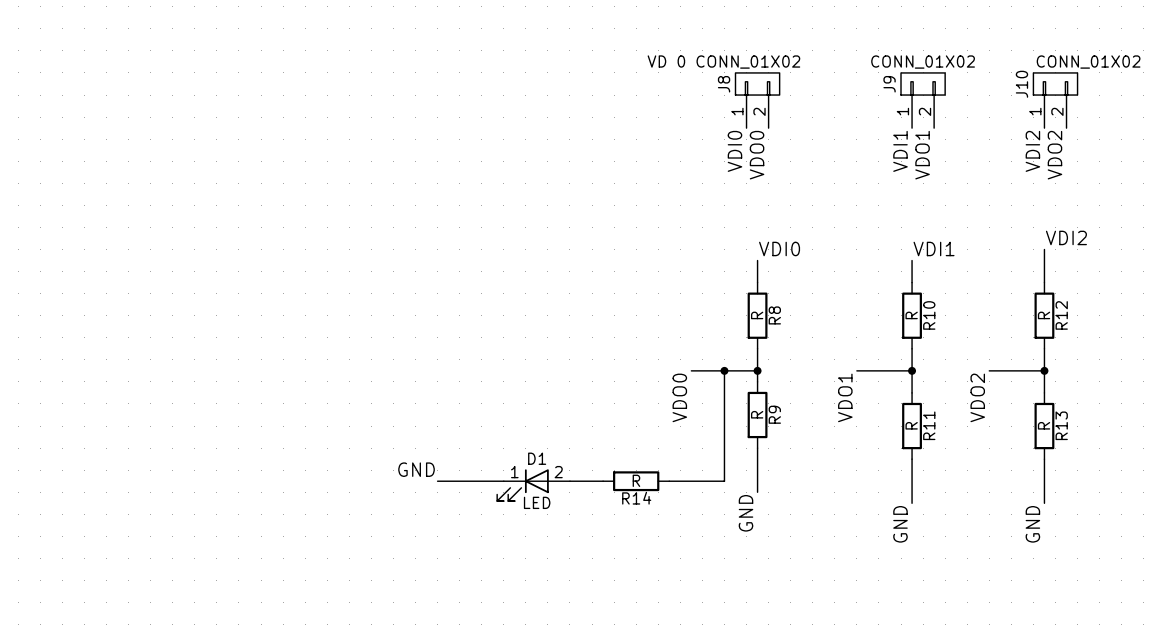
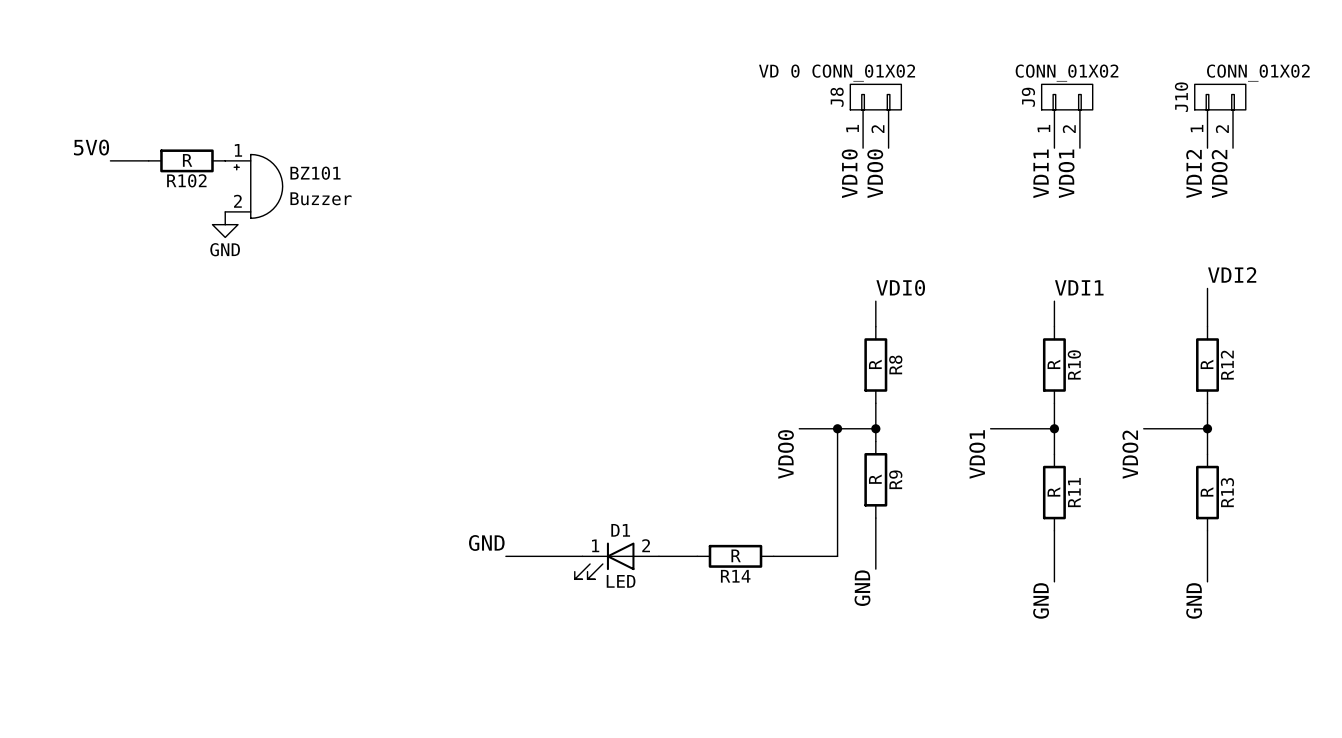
label: none -> 5V0 (91, 147)
wire: none -> (110, 160) (148, 160)
R102: none -> R (186, 160)
BZ101: none -> Buzzer (253, 186)
power symbol: none -> GND (225, 224)

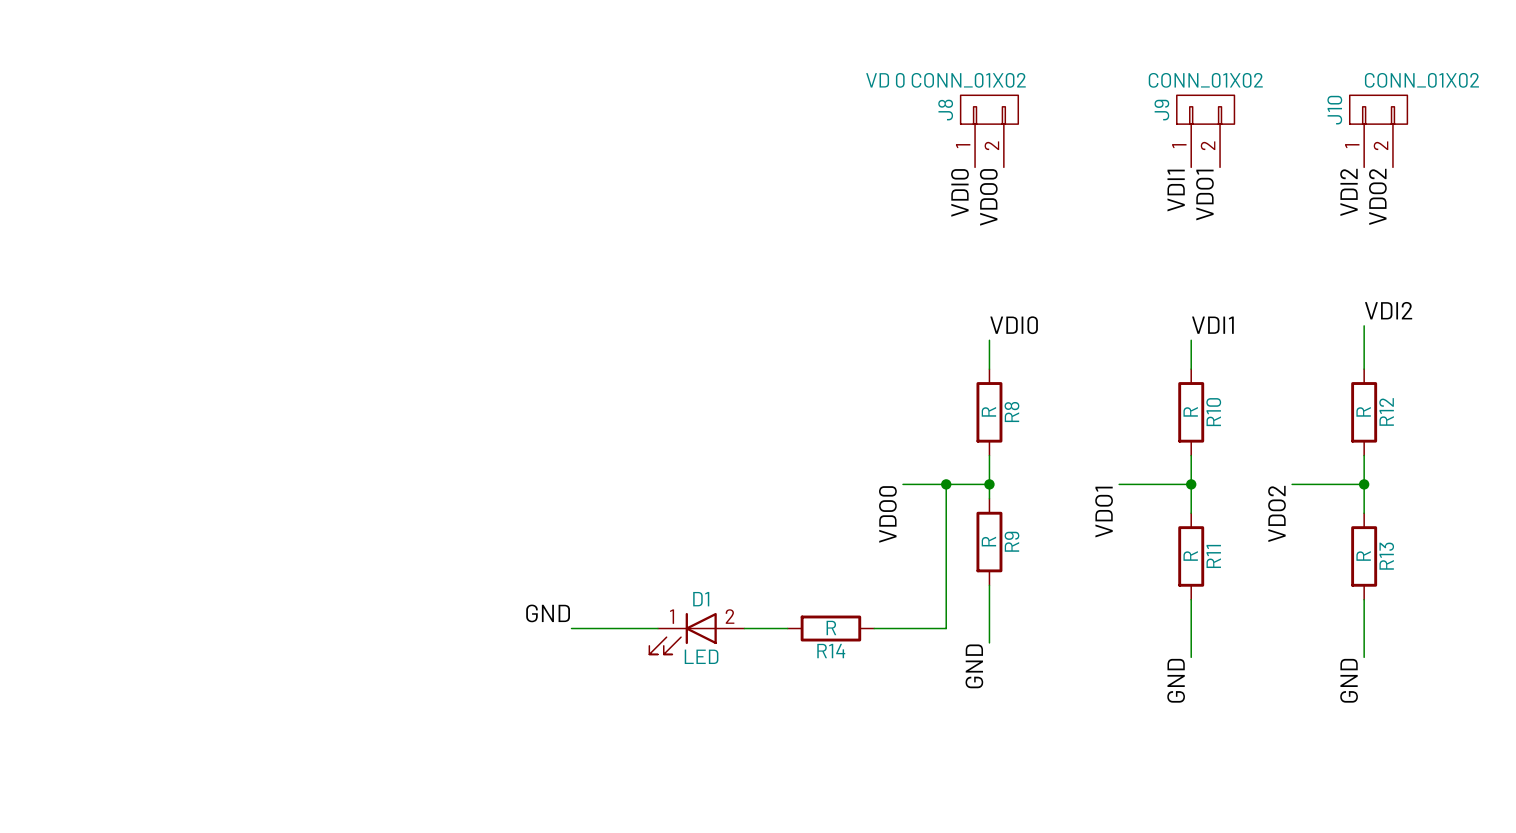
label: 5V0 (91, 147) -> none
wire: (110, 160) (148, 160) -> none
R102: R (186, 160) -> none
BZ101: Buzzer (253, 186) -> none
power symbol: GND (225, 224) -> none

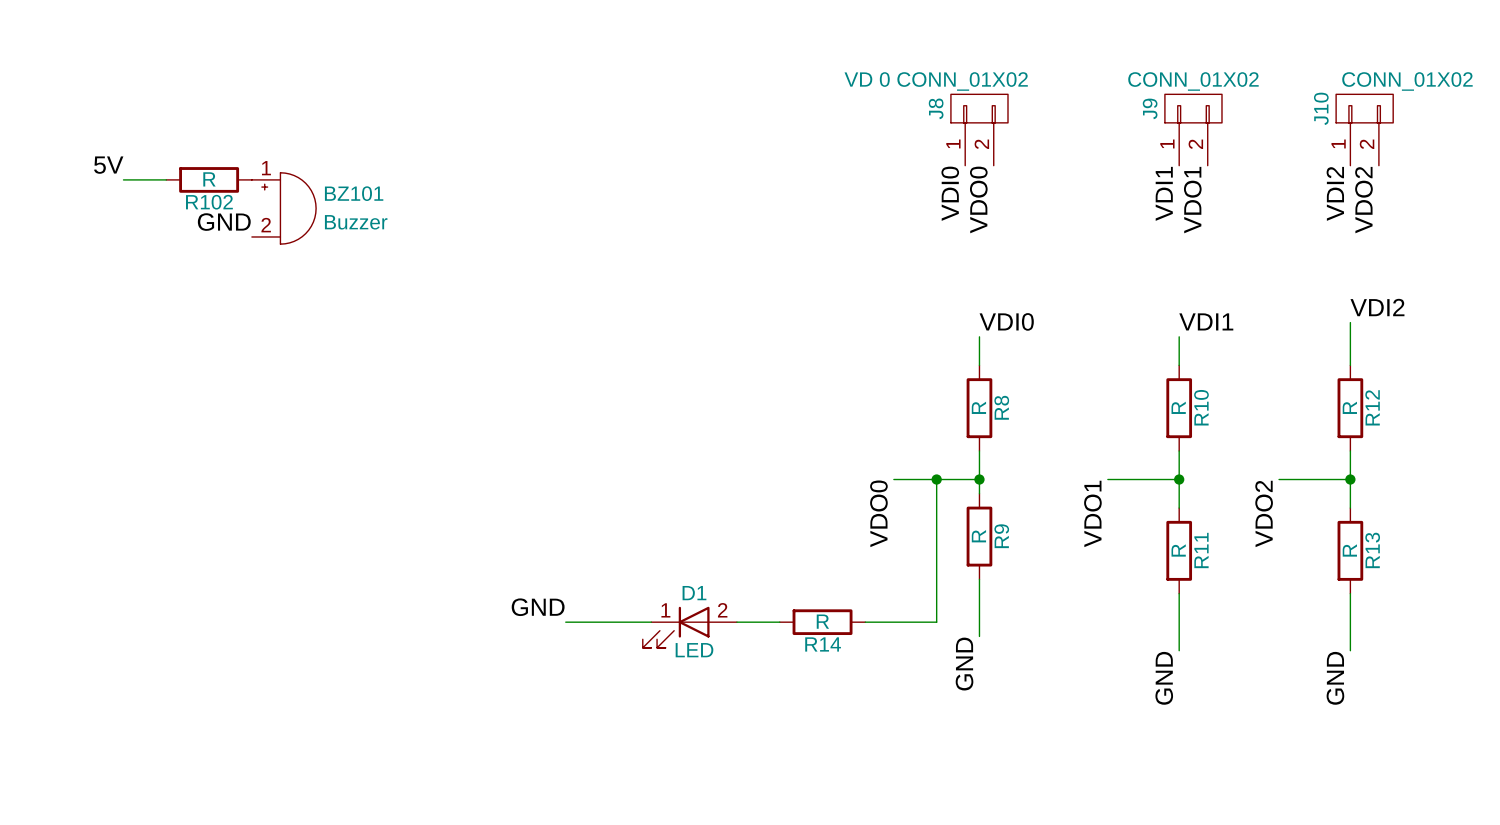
label: none -> 5V (108, 165)
wire: none -> (123, 179) (166, 179)
R102: none -> R (209, 179)
BZ101: none -> Buzzer (284, 208)
label: none -> GND (224, 222)

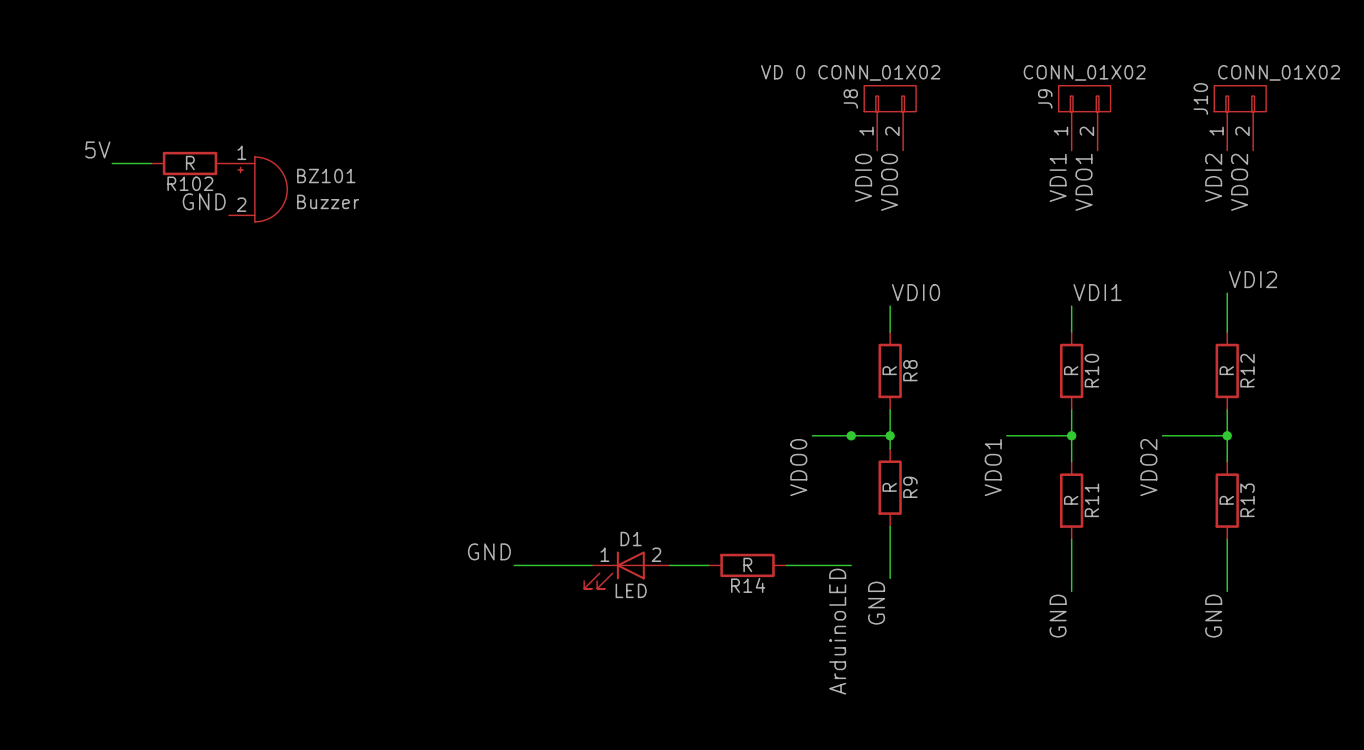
wire: (936, 479) (936, 622) -> none
label: none -> ArduinoLED (837, 631)

